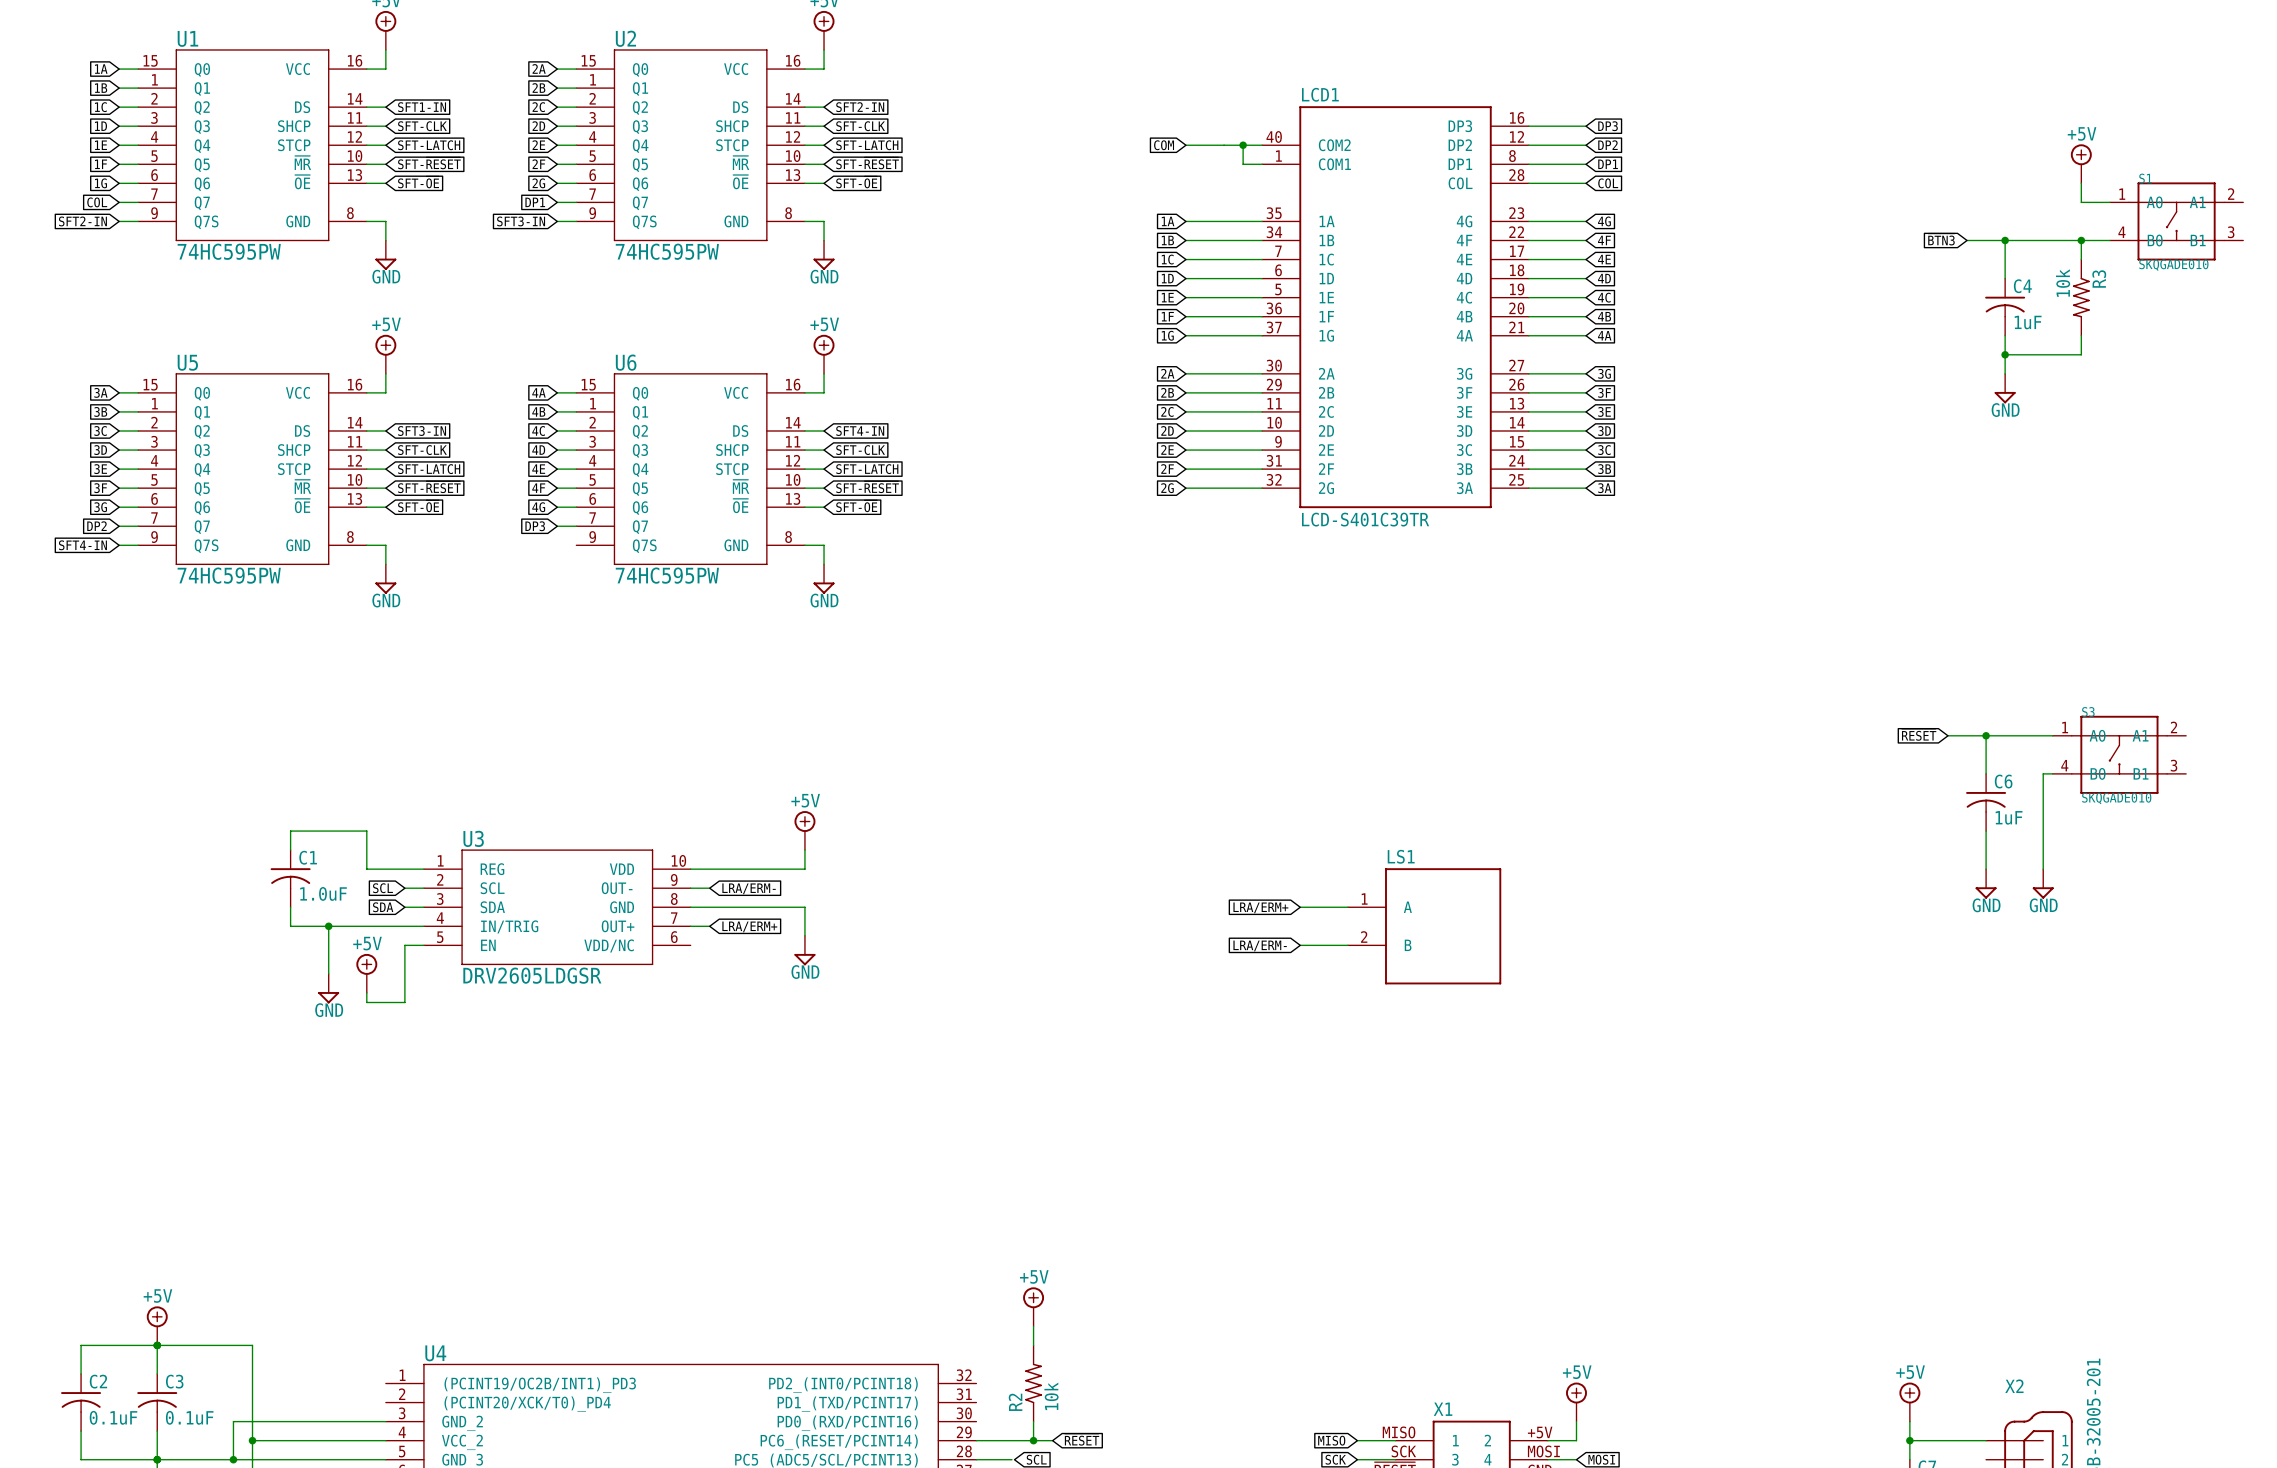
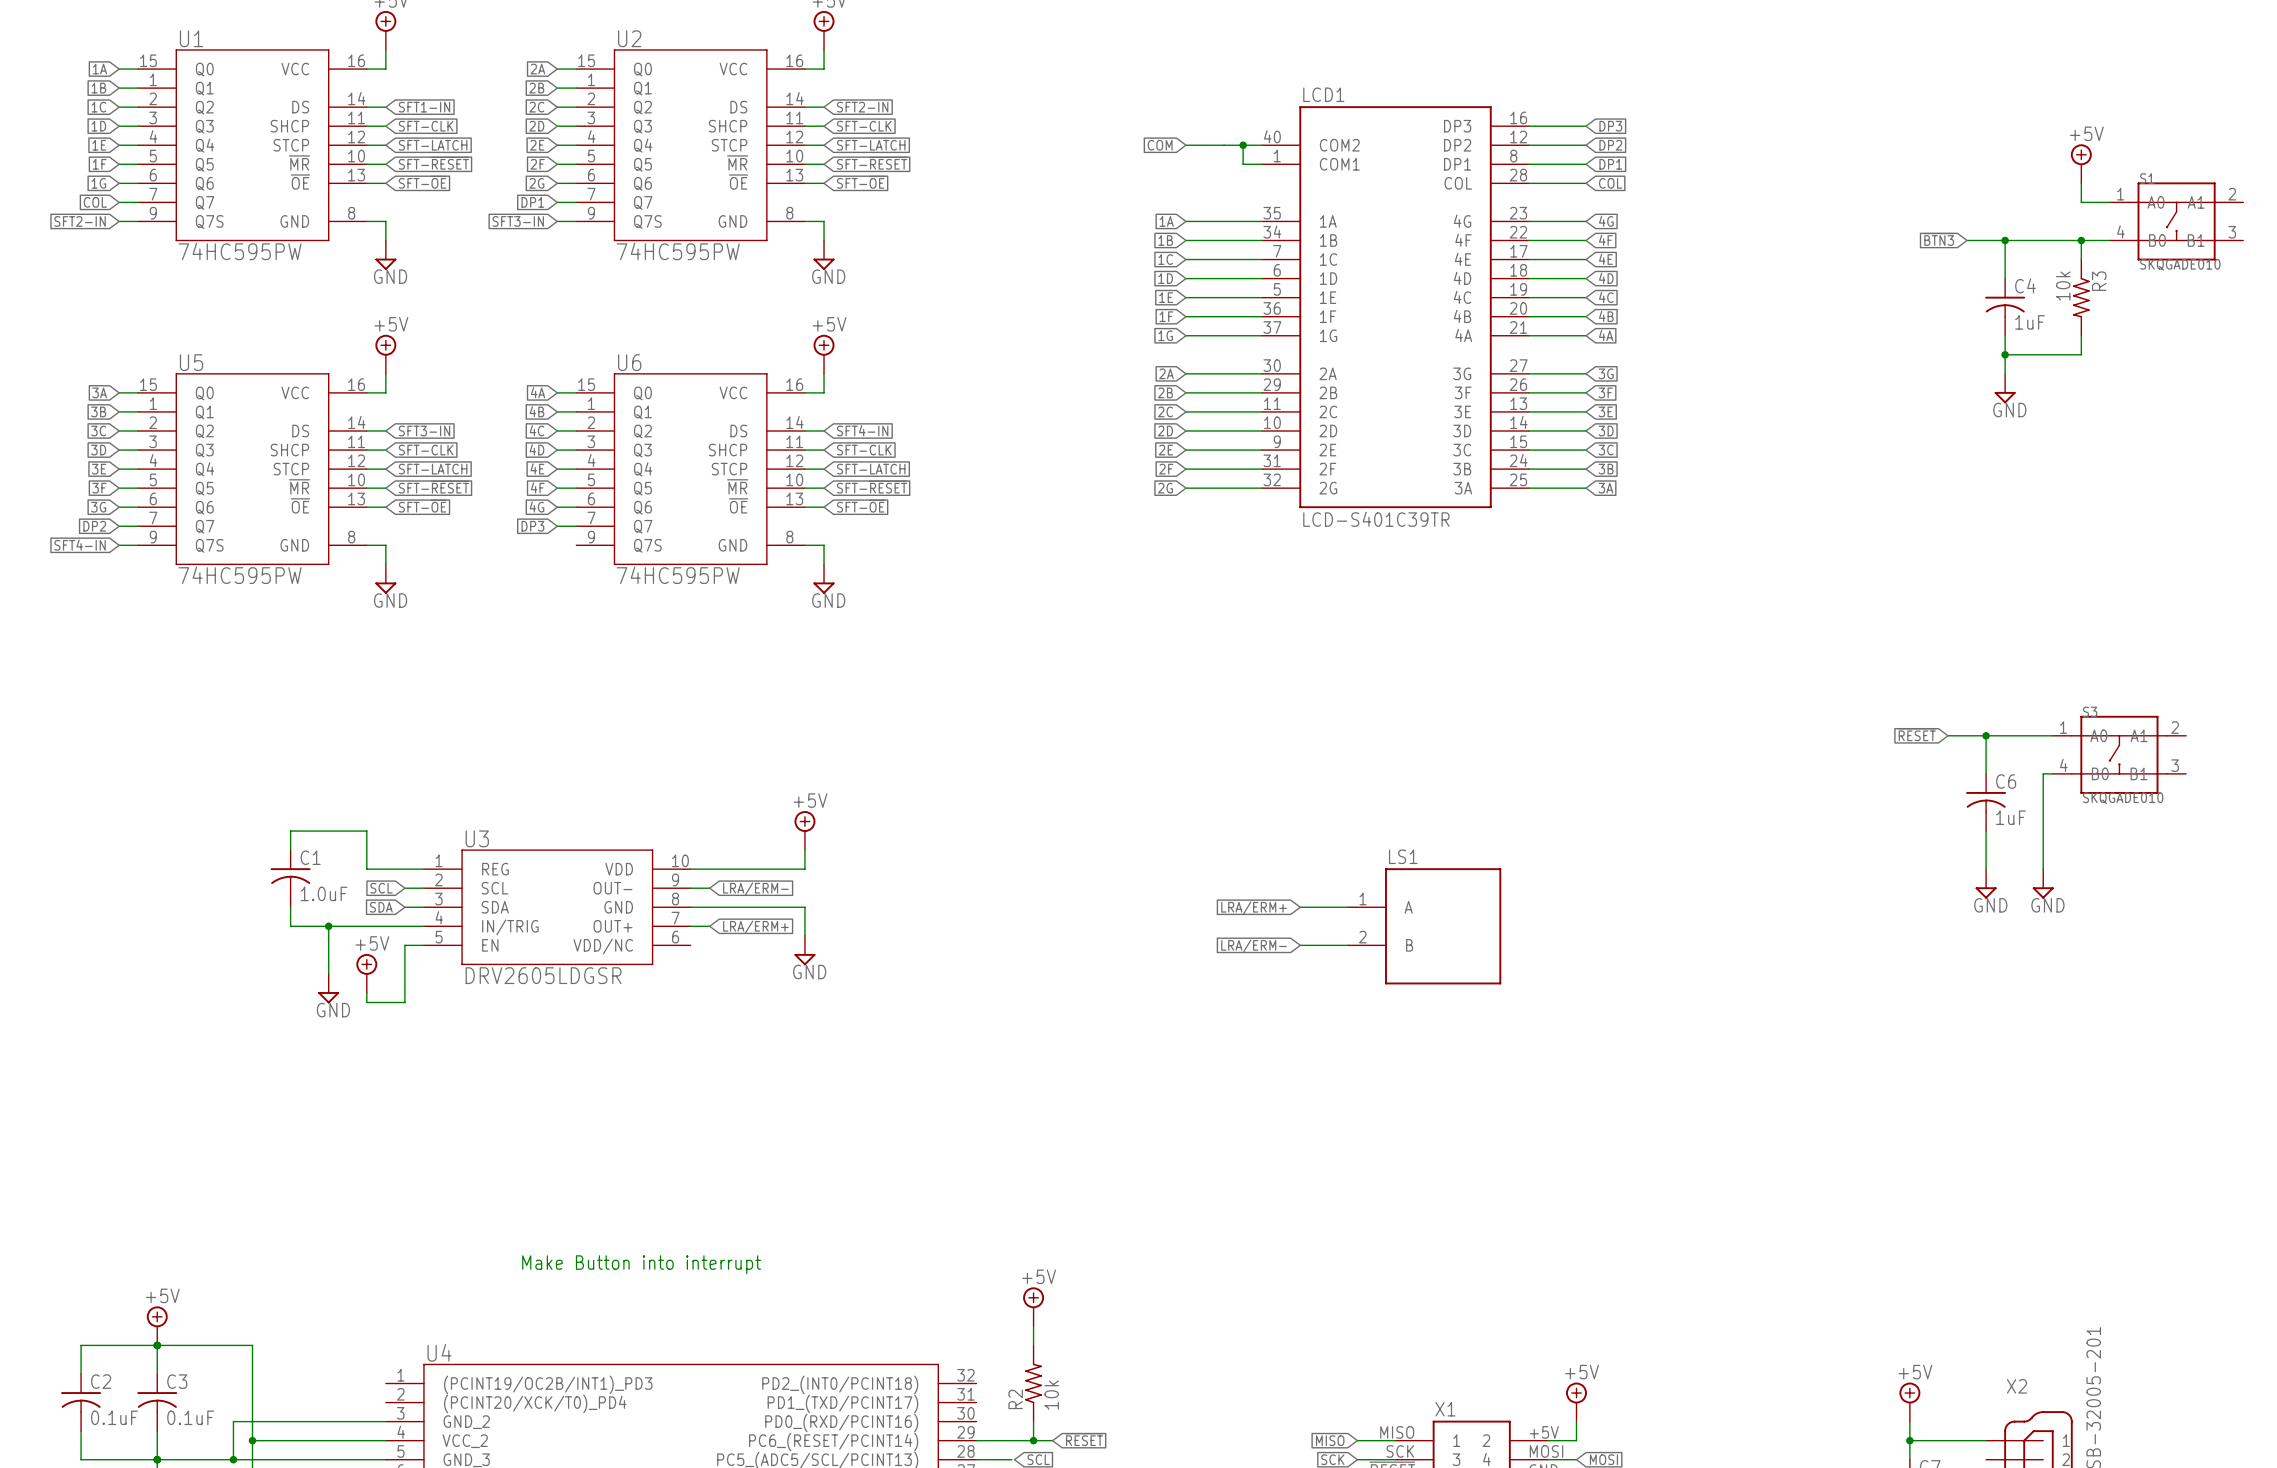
text: none -> Make Button into interrupt (641, 1264)

